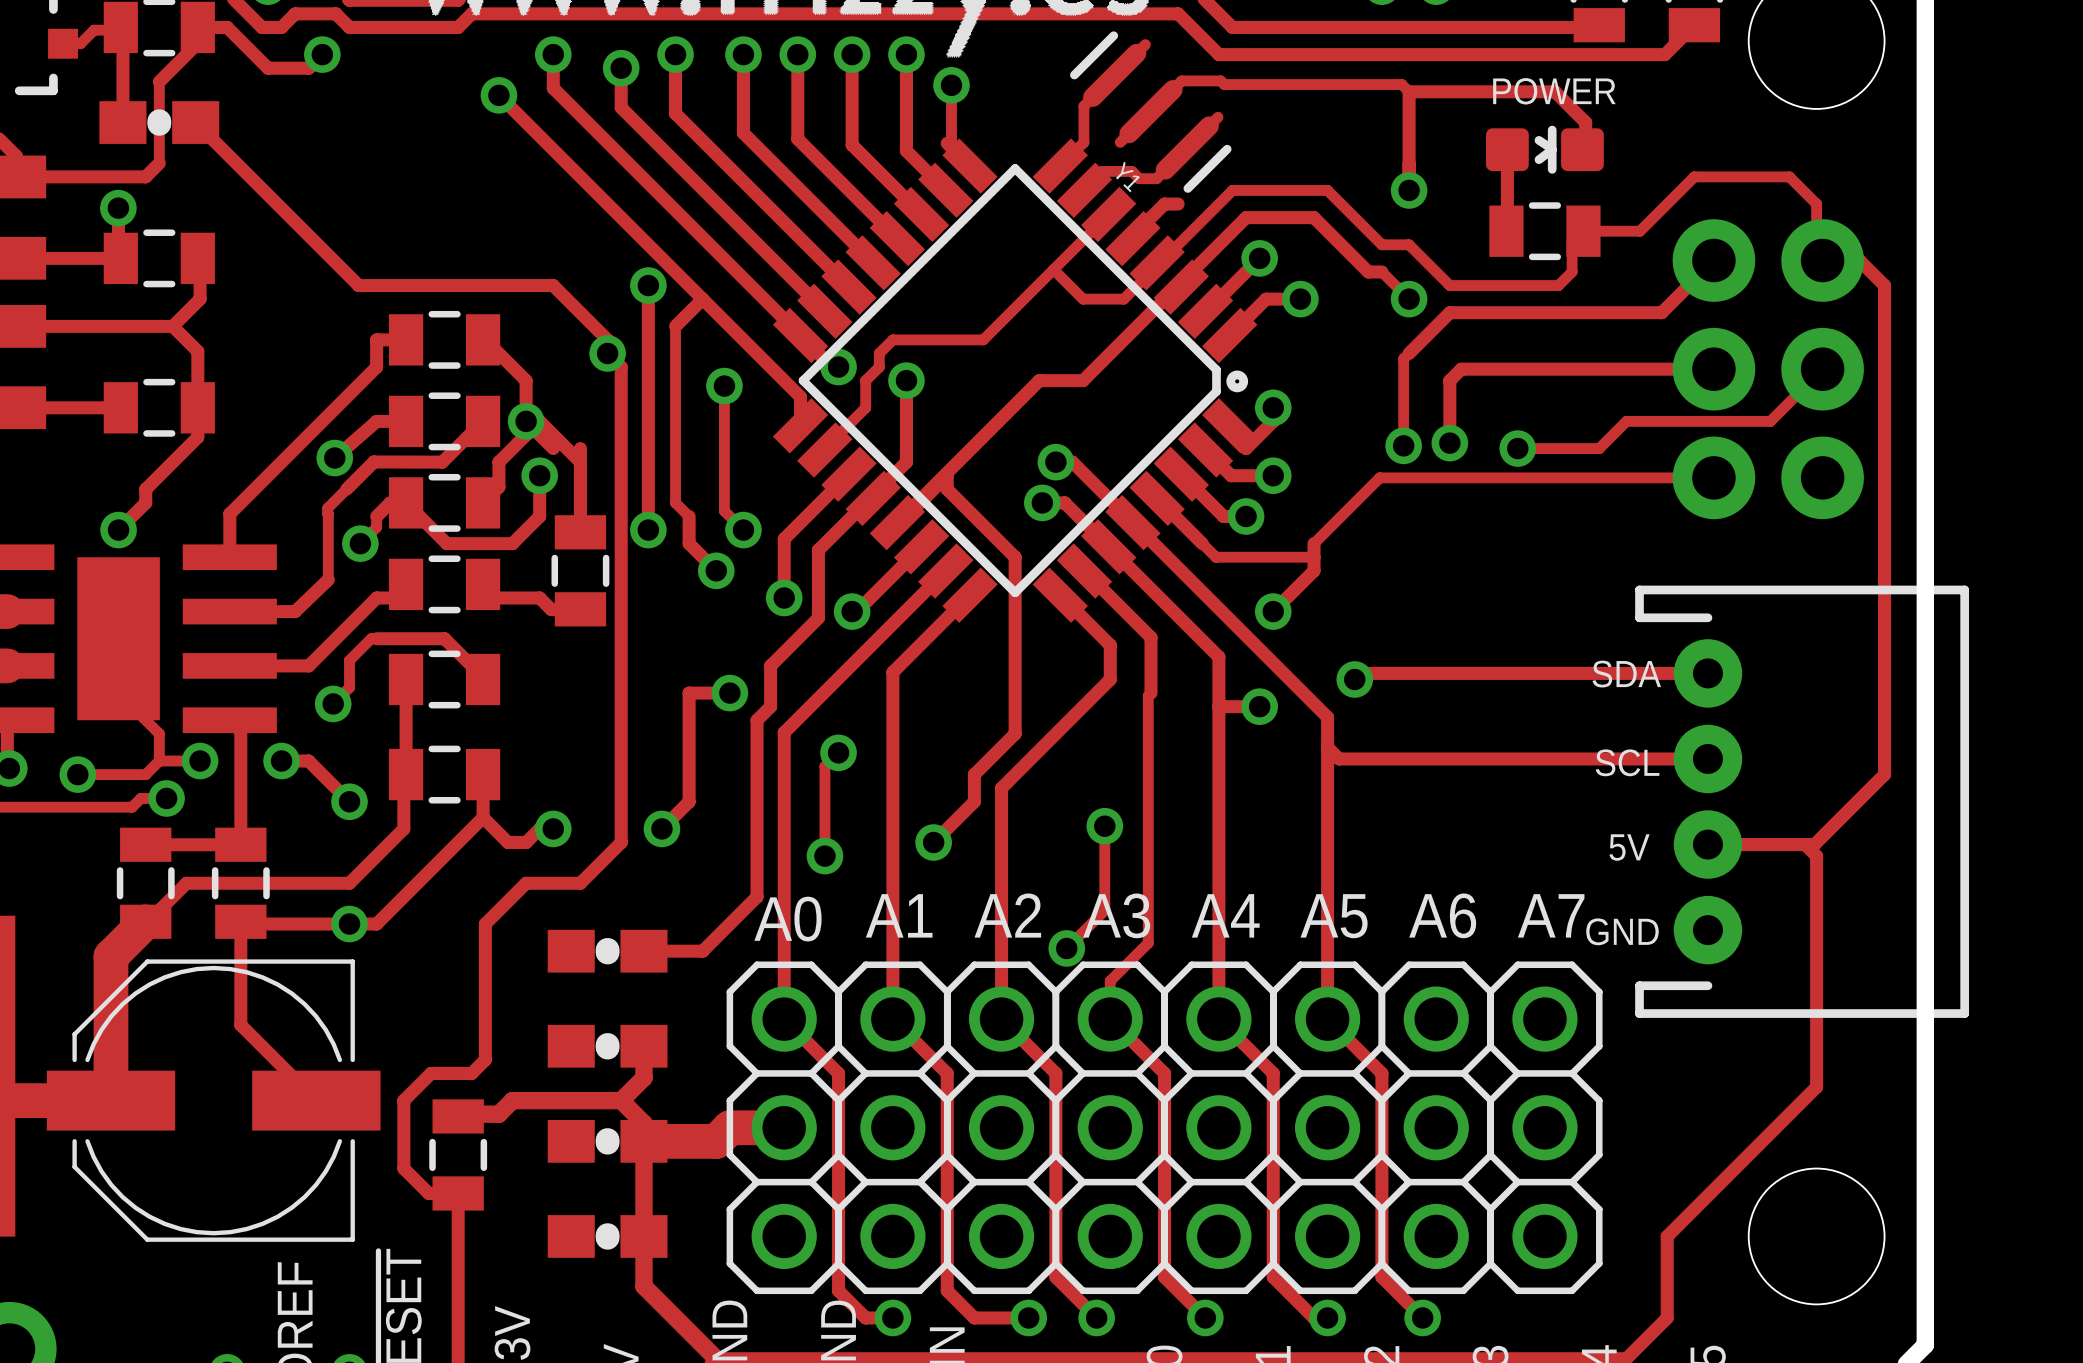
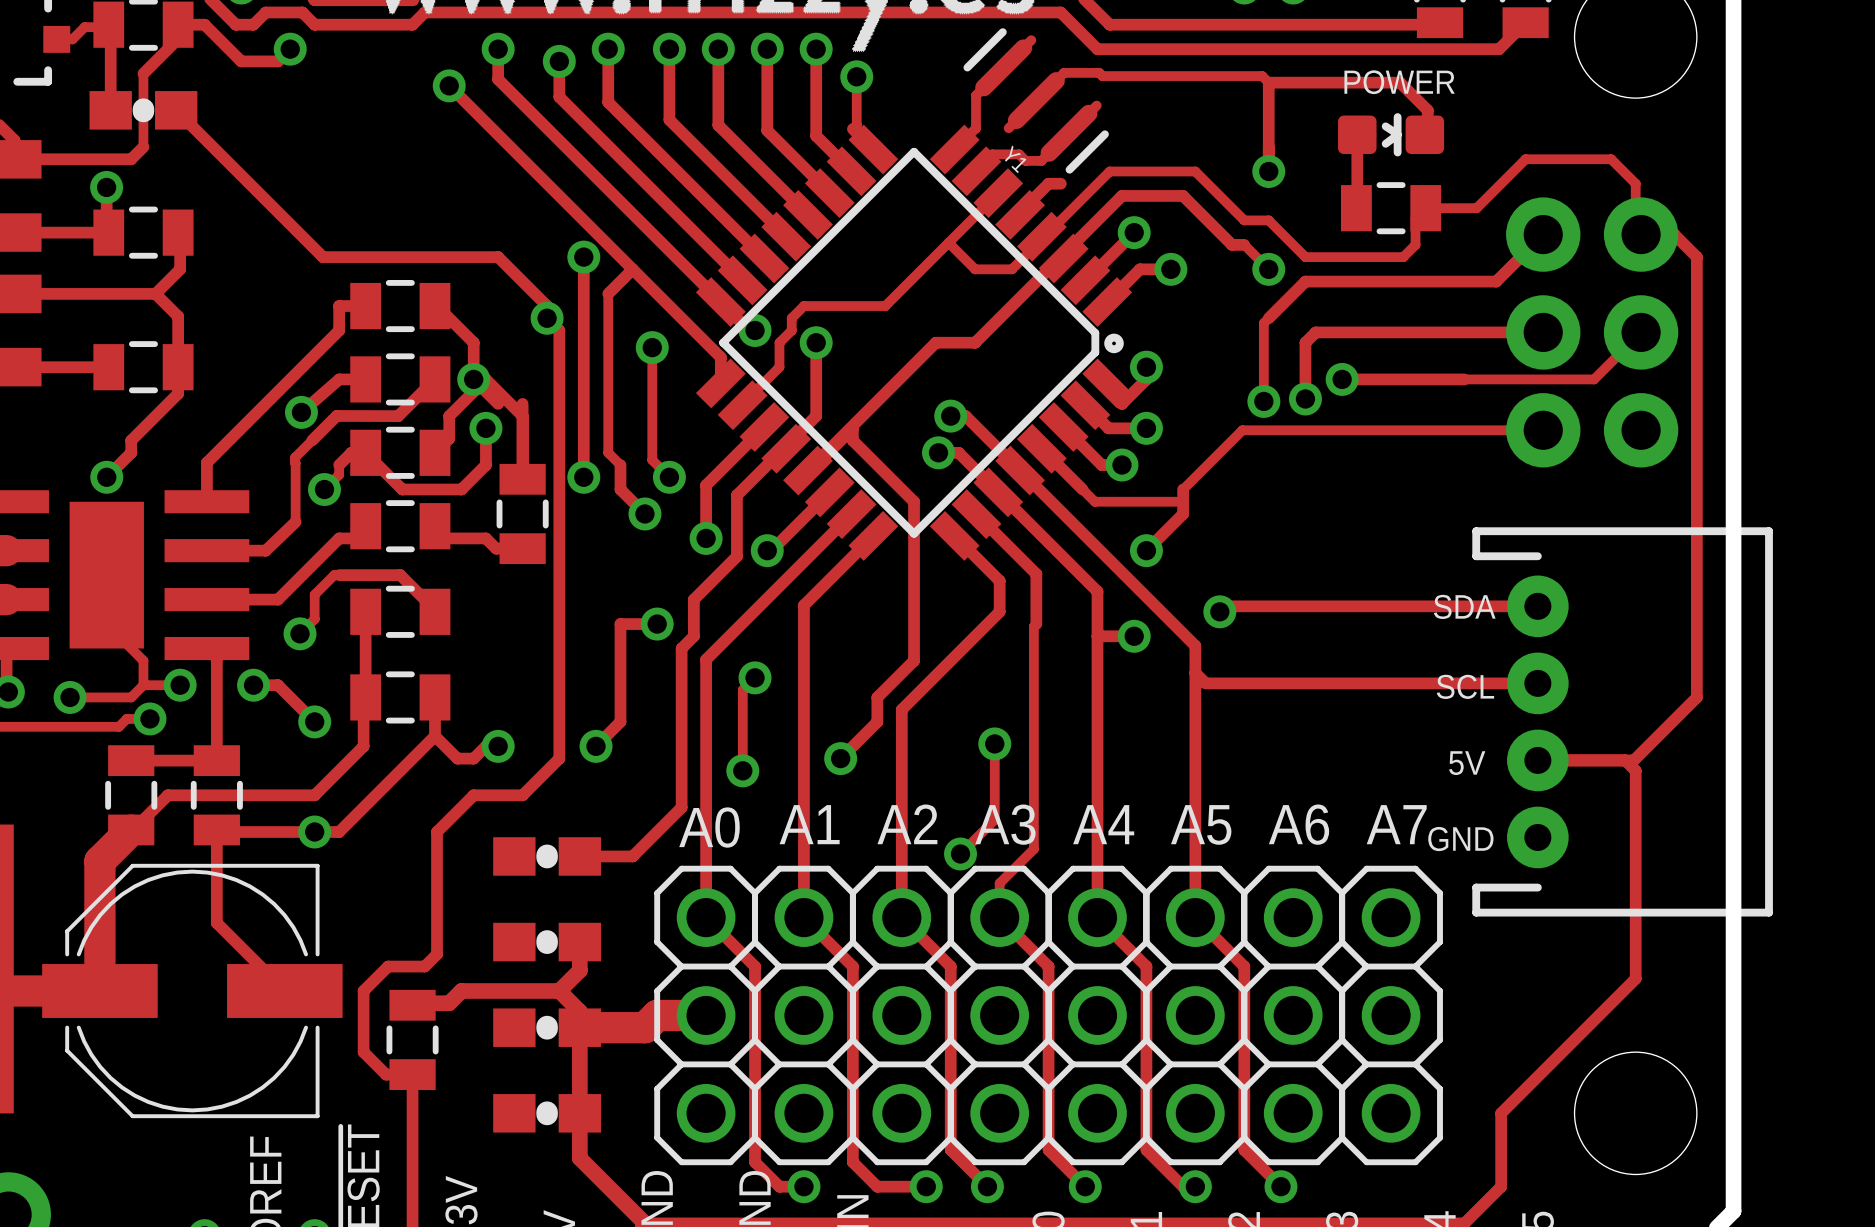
track: (1626, 421) (1599, 448) (1517, 448) -> (1464, 379) (1342, 379)
via position: (1517, 448) -> (1342, 379)

